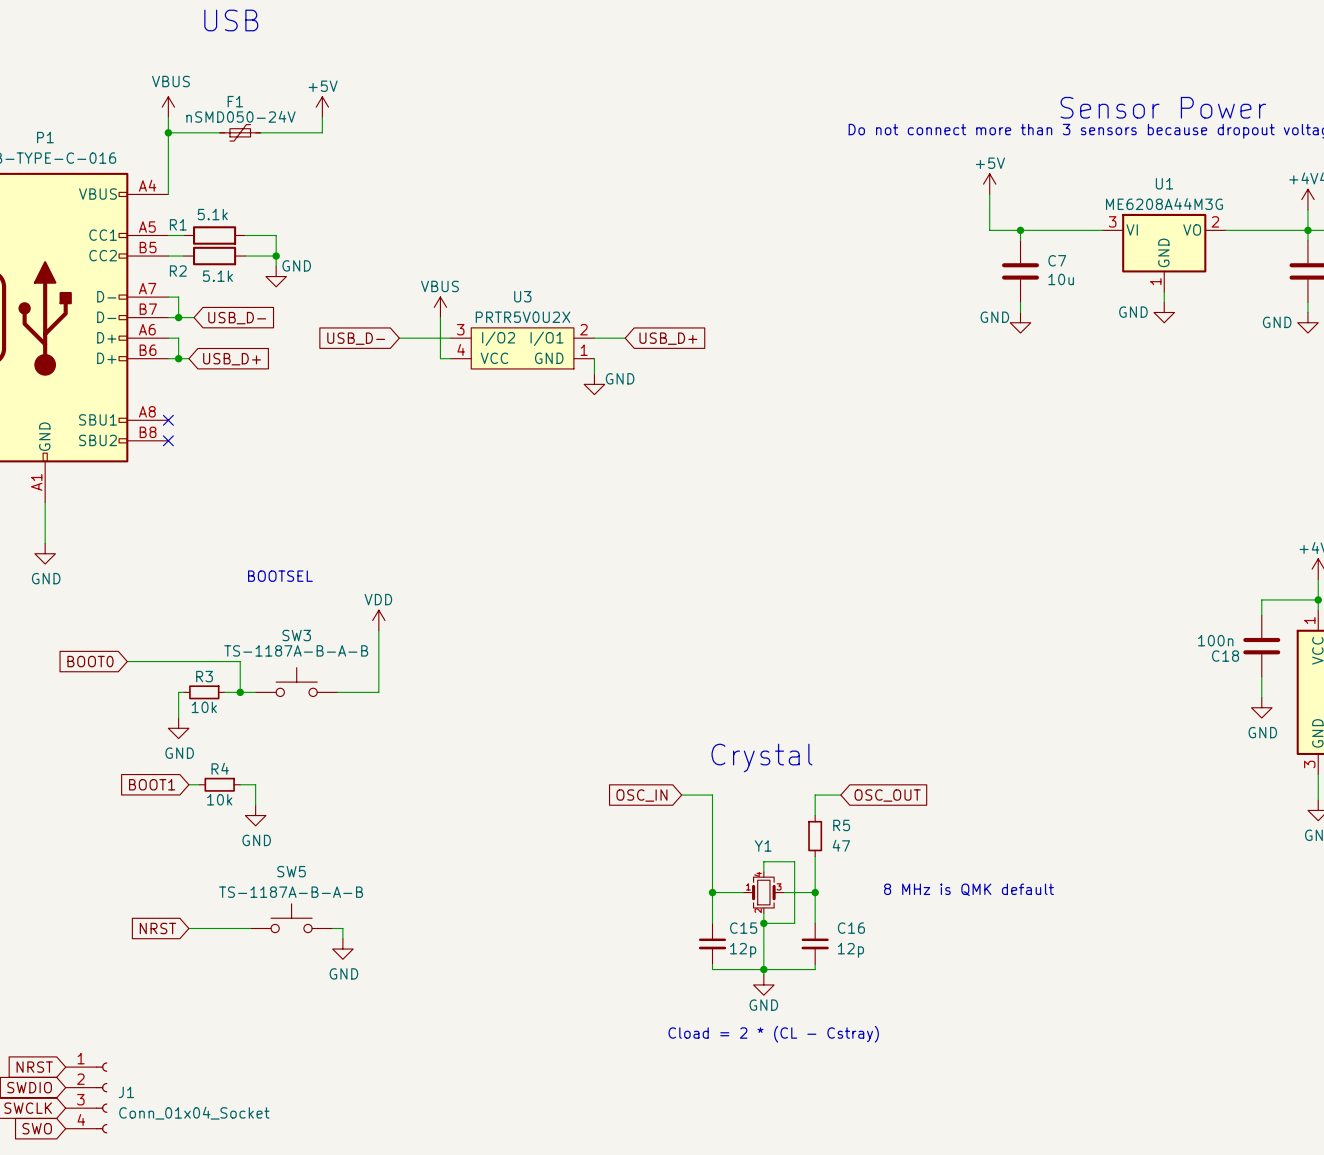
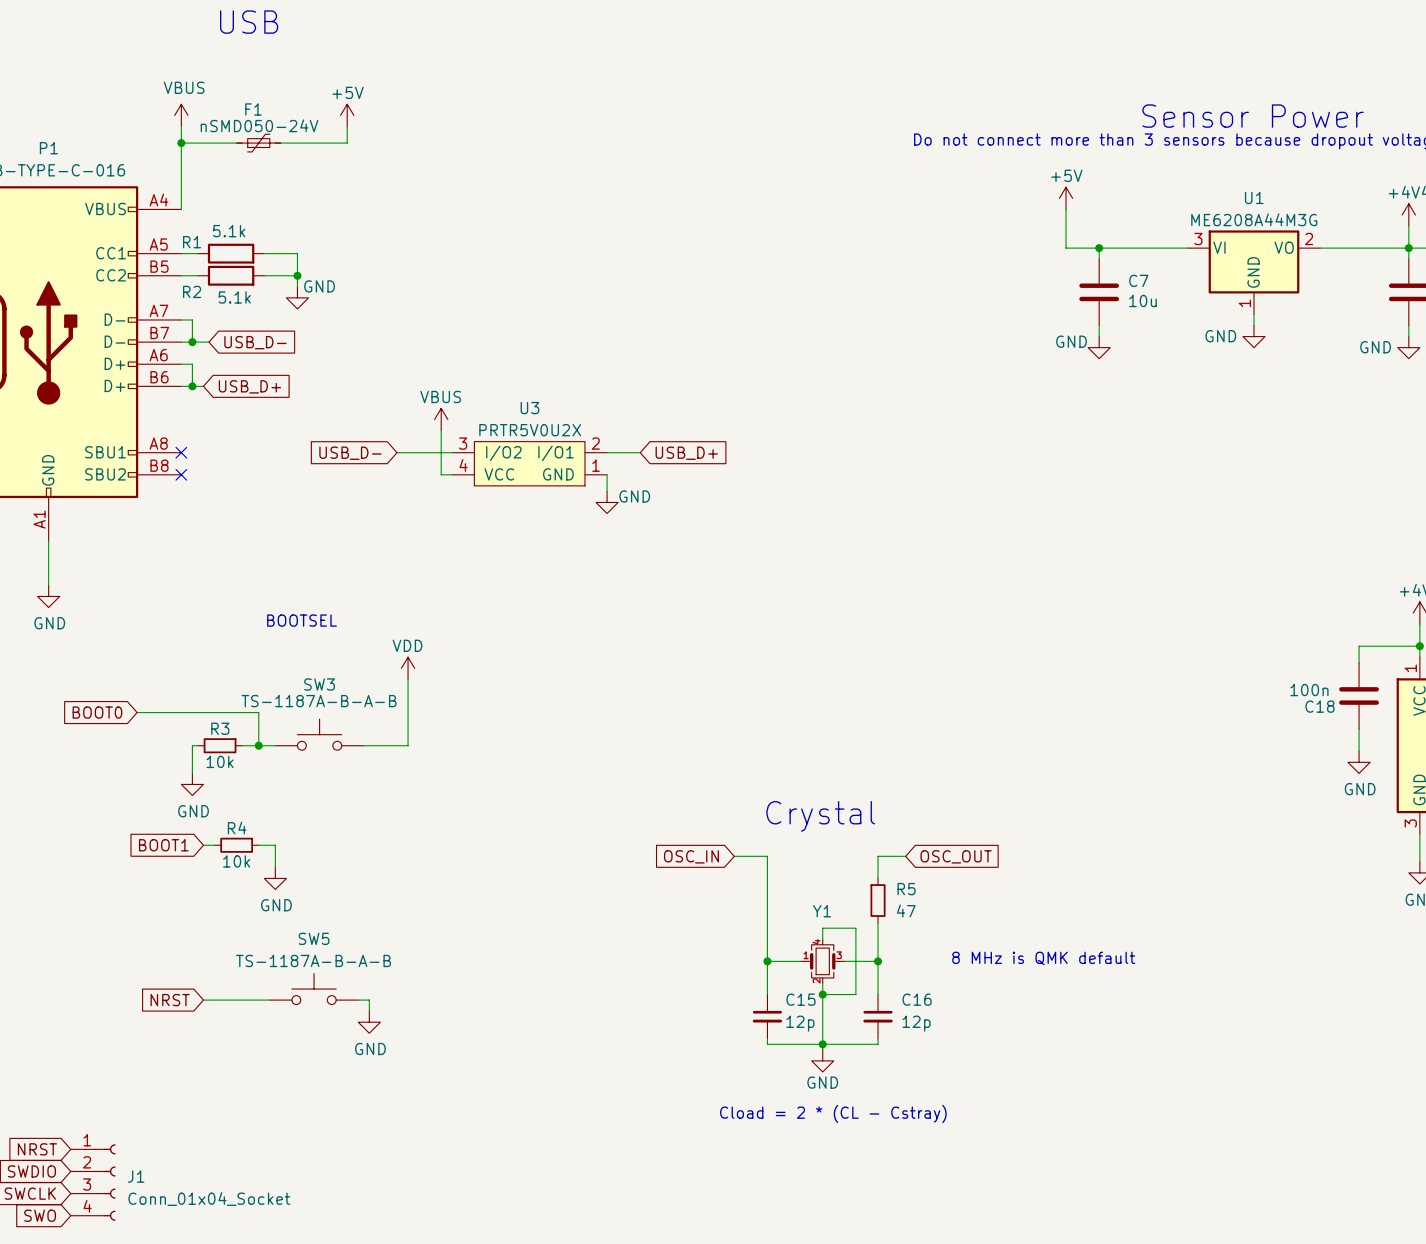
power symbol position: VBUS (440, 307) -> VBUS (441, 419)
wire: (440, 317) (440, 358) (450, 358) -> (441, 430) (441, 474) (452, 474)
global label position: USB_D- (356, 338) -> USB_D- (350, 453)
wire: (399, 338) (450, 338) -> (396, 452) (452, 452)
wire: (594, 338) (625, 338) -> (607, 452) (640, 452)
global label position: USB_D+ (668, 338) -> USB_D+ (686, 453)
U3 position: (522, 348) -> (529, 463)
wire: (594, 358) (594, 374) -> (607, 474) (607, 491)
power symbol position: GND (594, 384) -> GND (607, 502)

